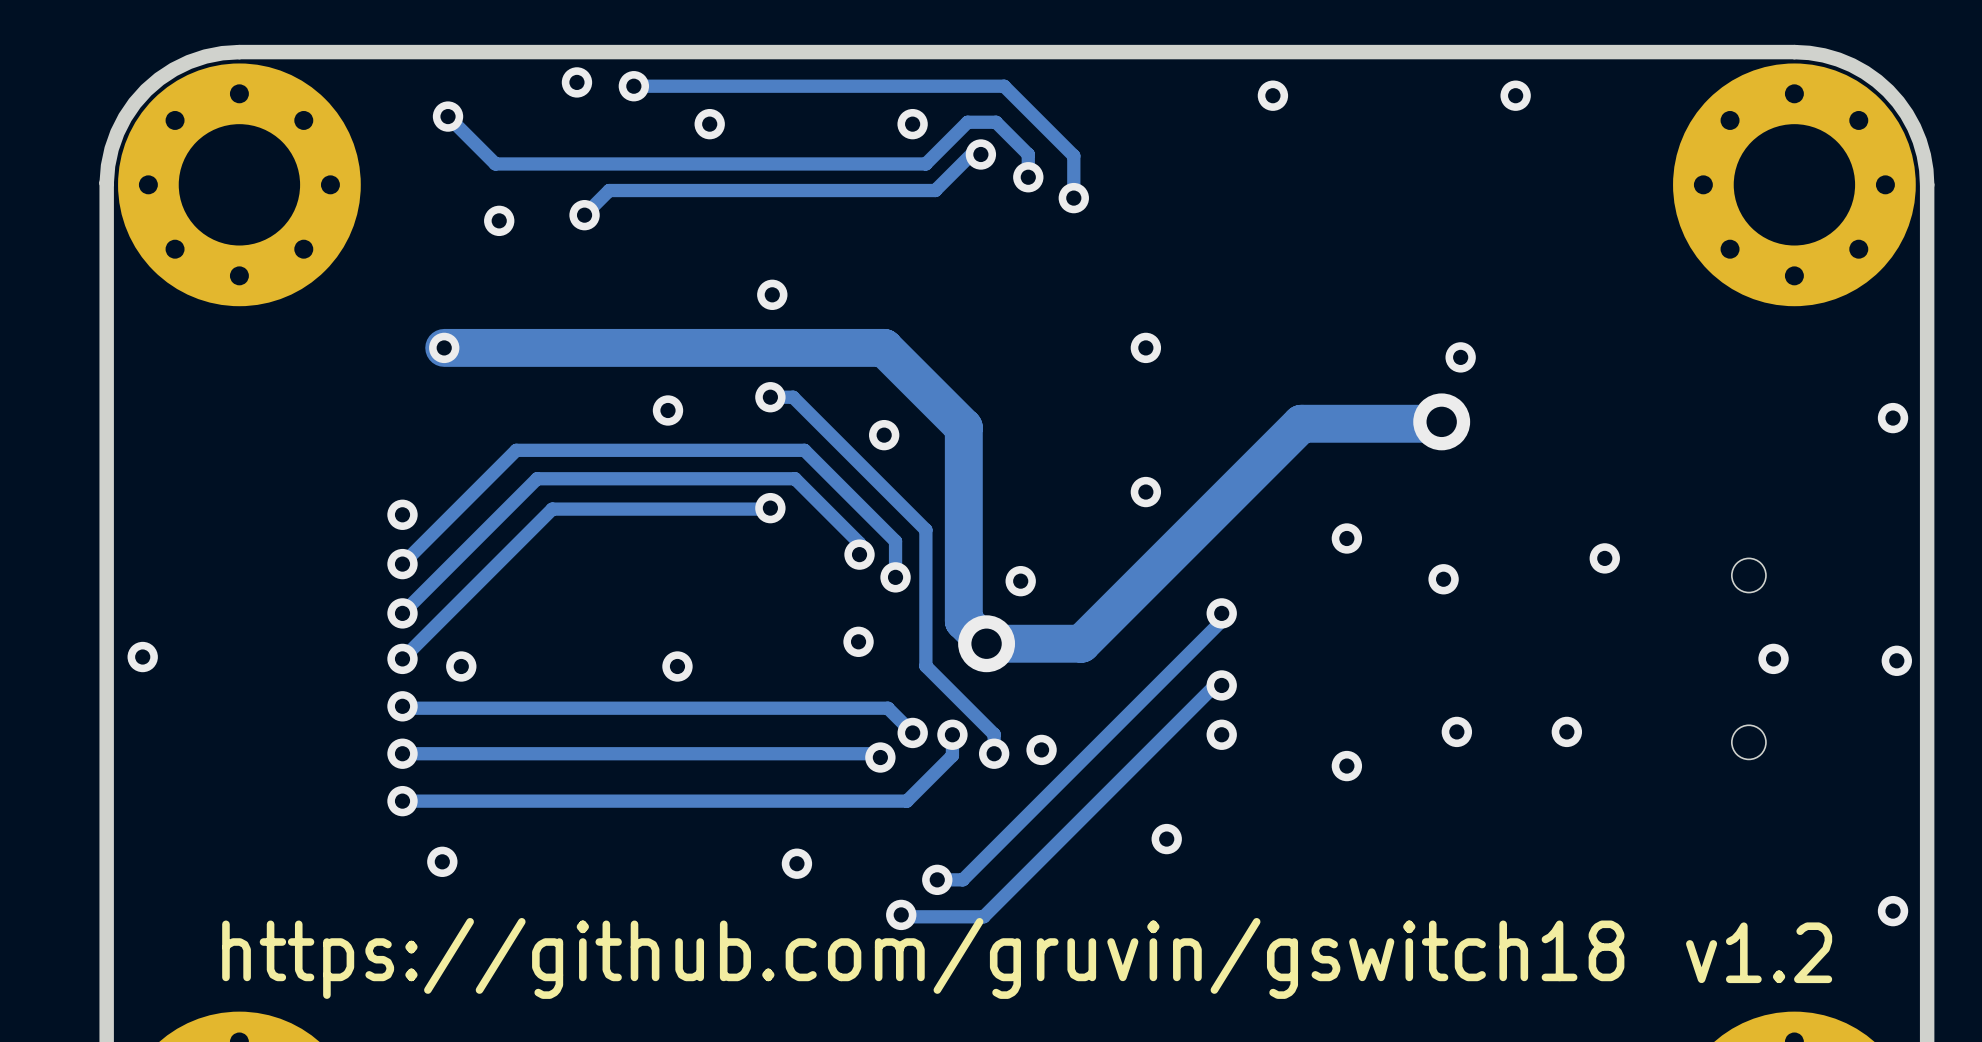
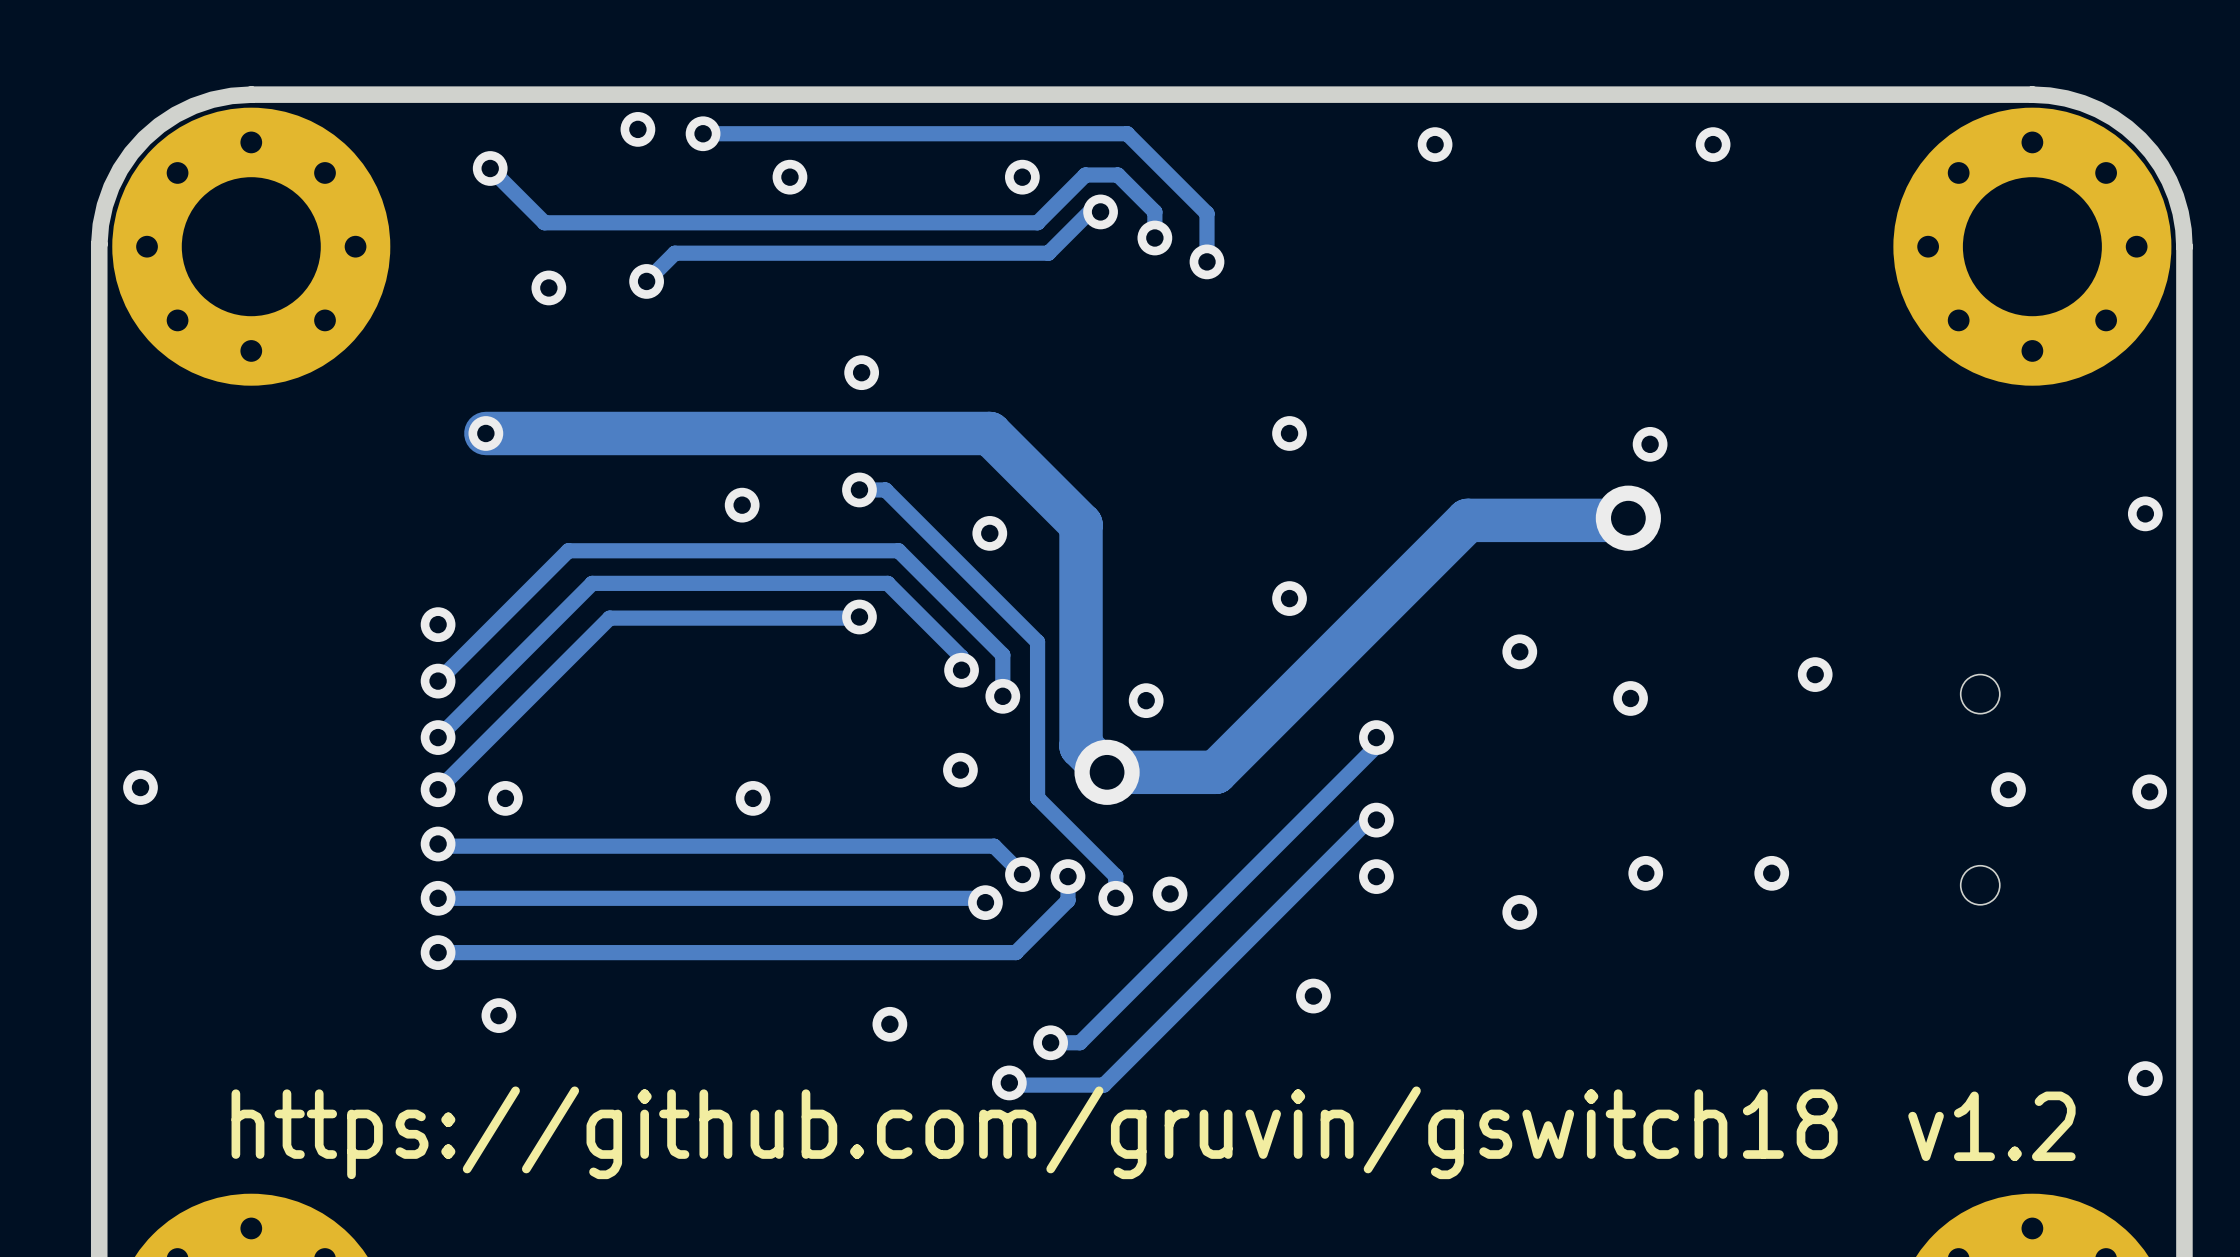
via position: (442, 861) -> (498, 1015)

